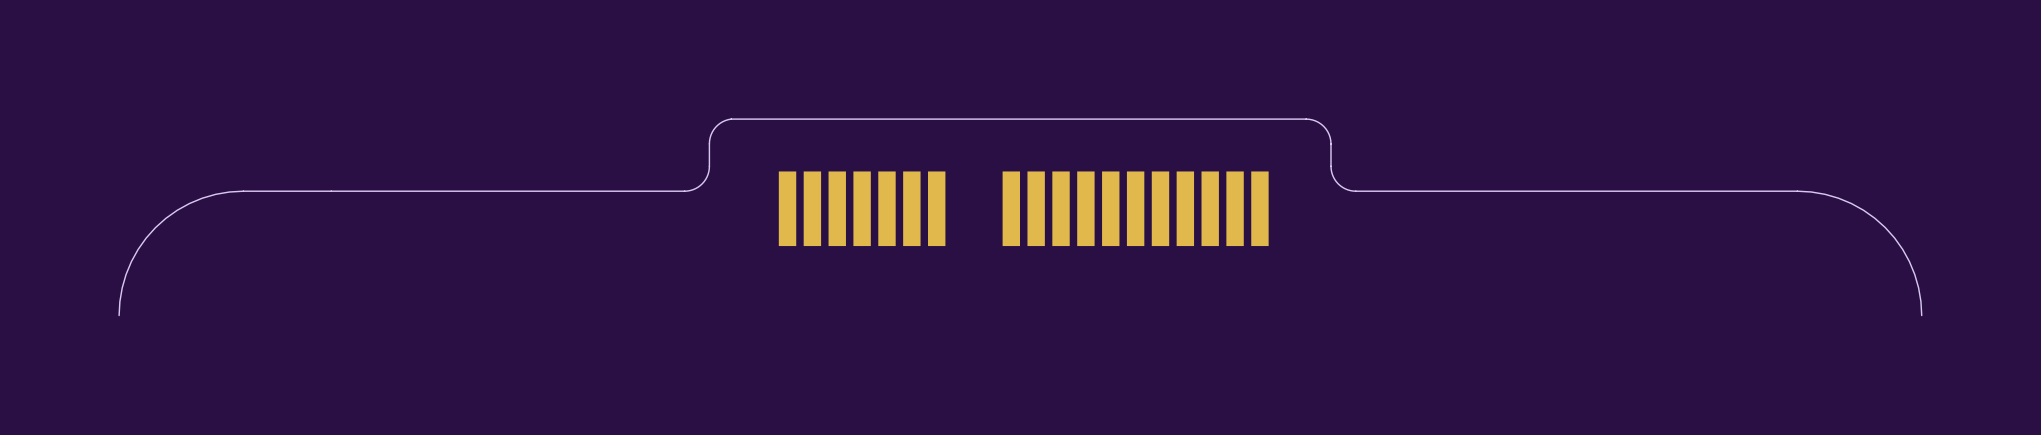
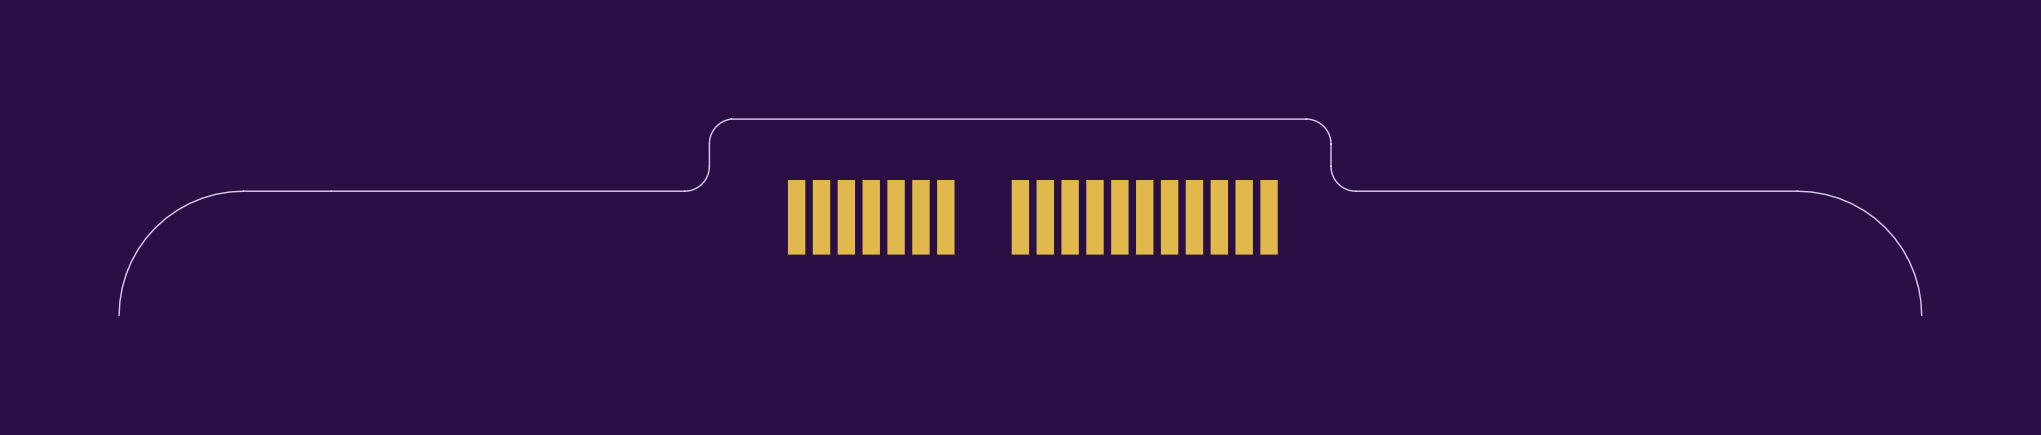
part position: (1023, 208) -> (1032, 217)

